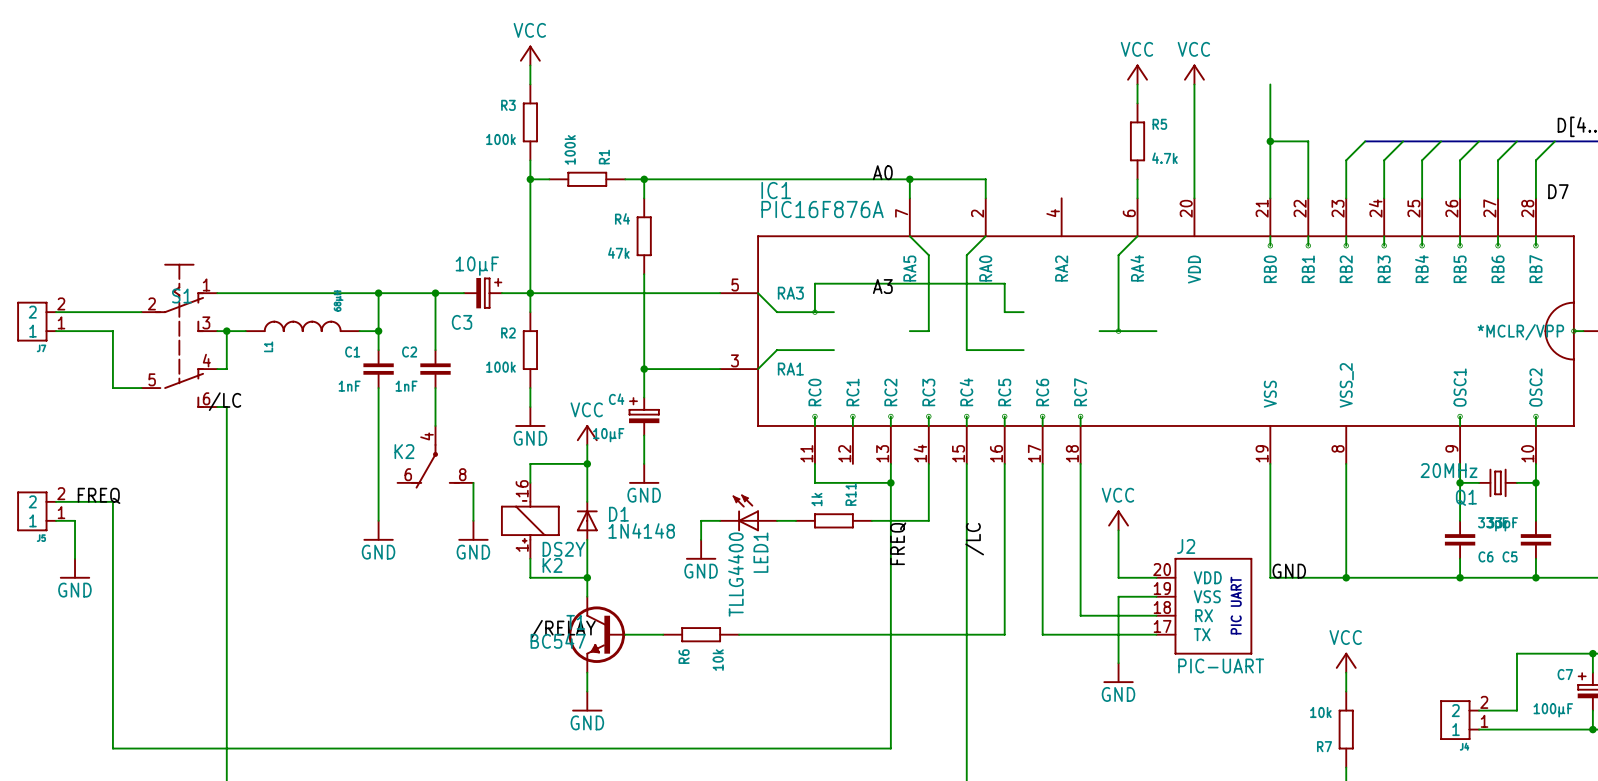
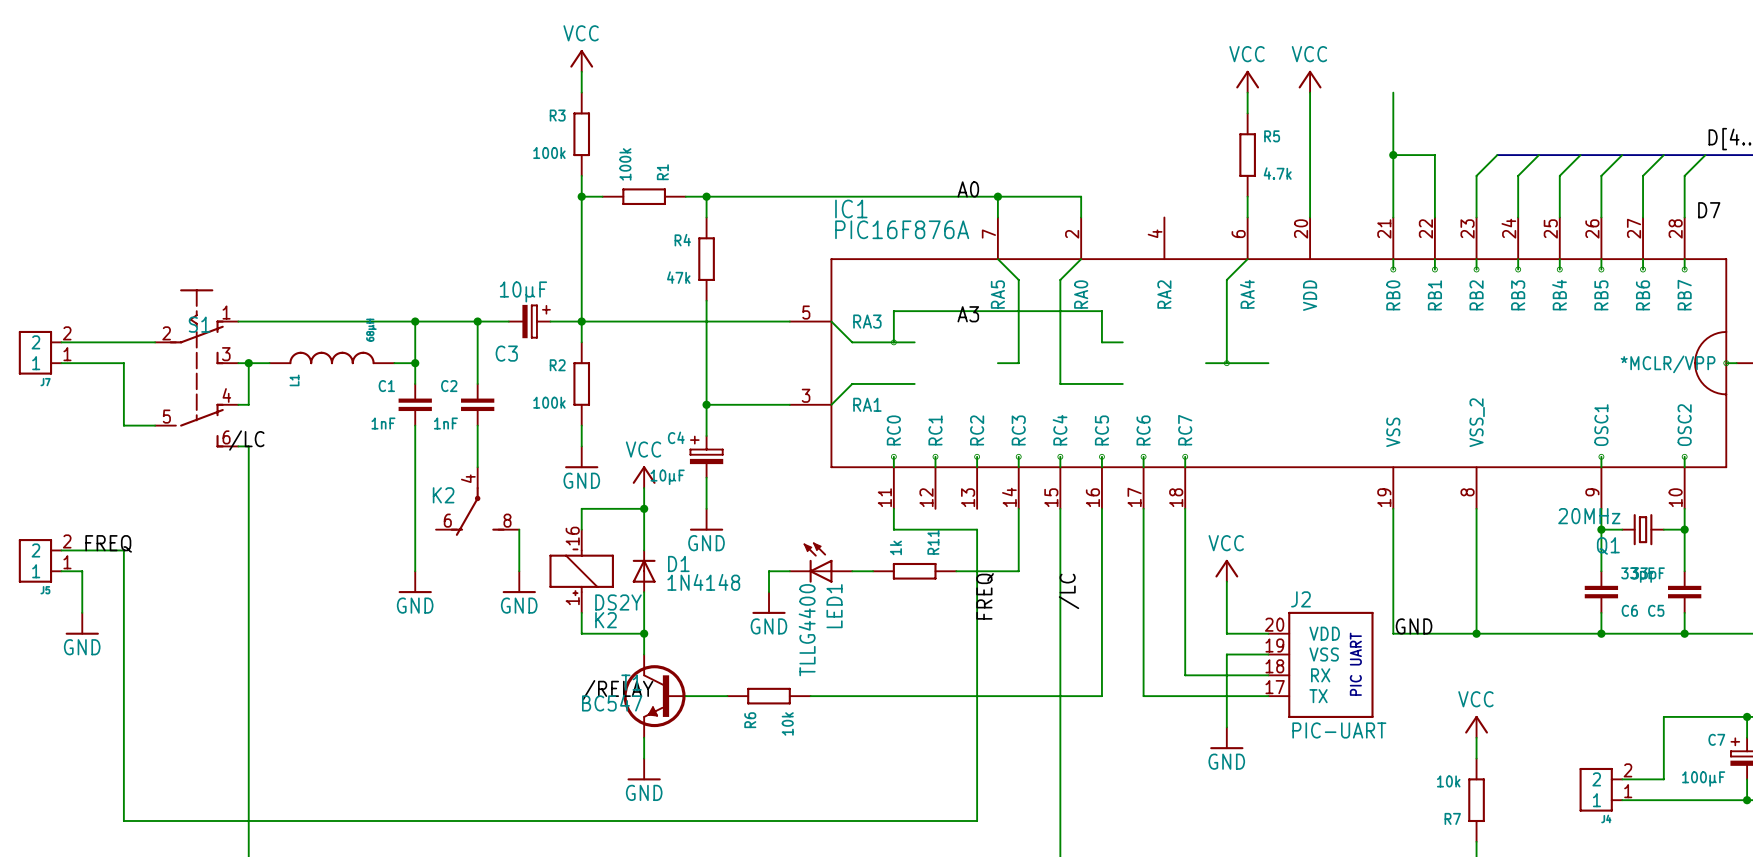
wire: (890, 463) (890, 482) -> none
junction: (890, 482) -> none

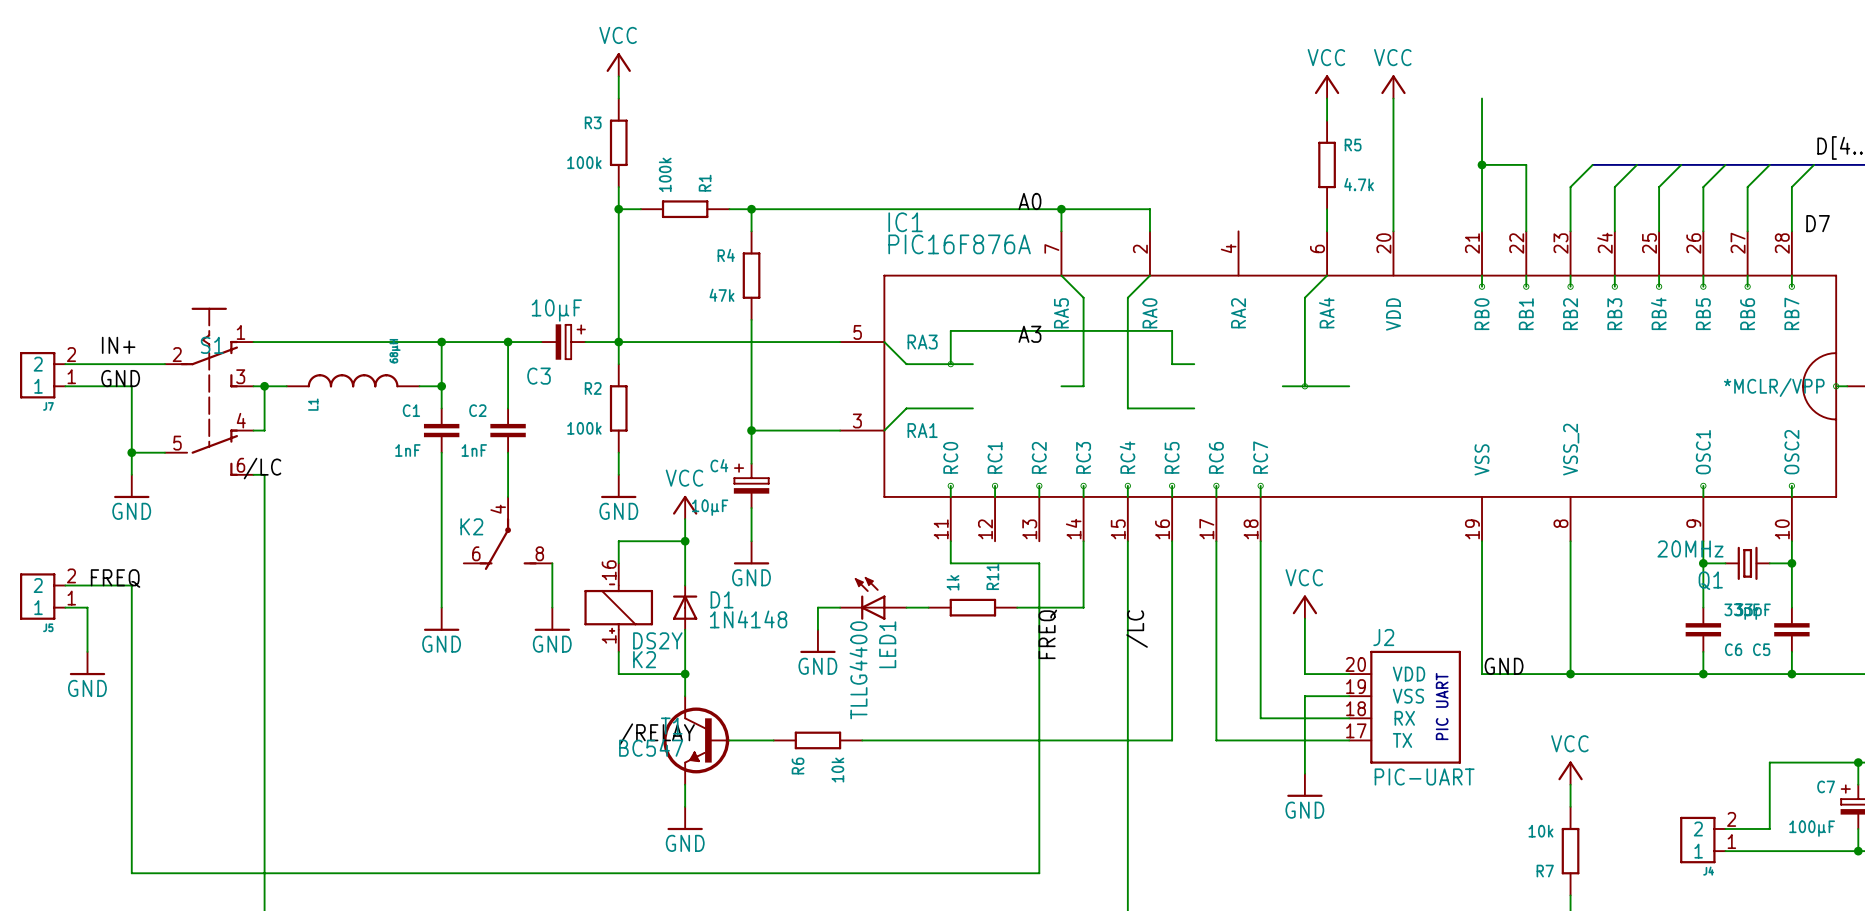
label: none -> IN+ (118, 345)
label: none -> GND (120, 378)
wire: none -> (131, 452) (131, 474)
junction: none -> (131, 452)
power symbol: none -> GND (131, 486)

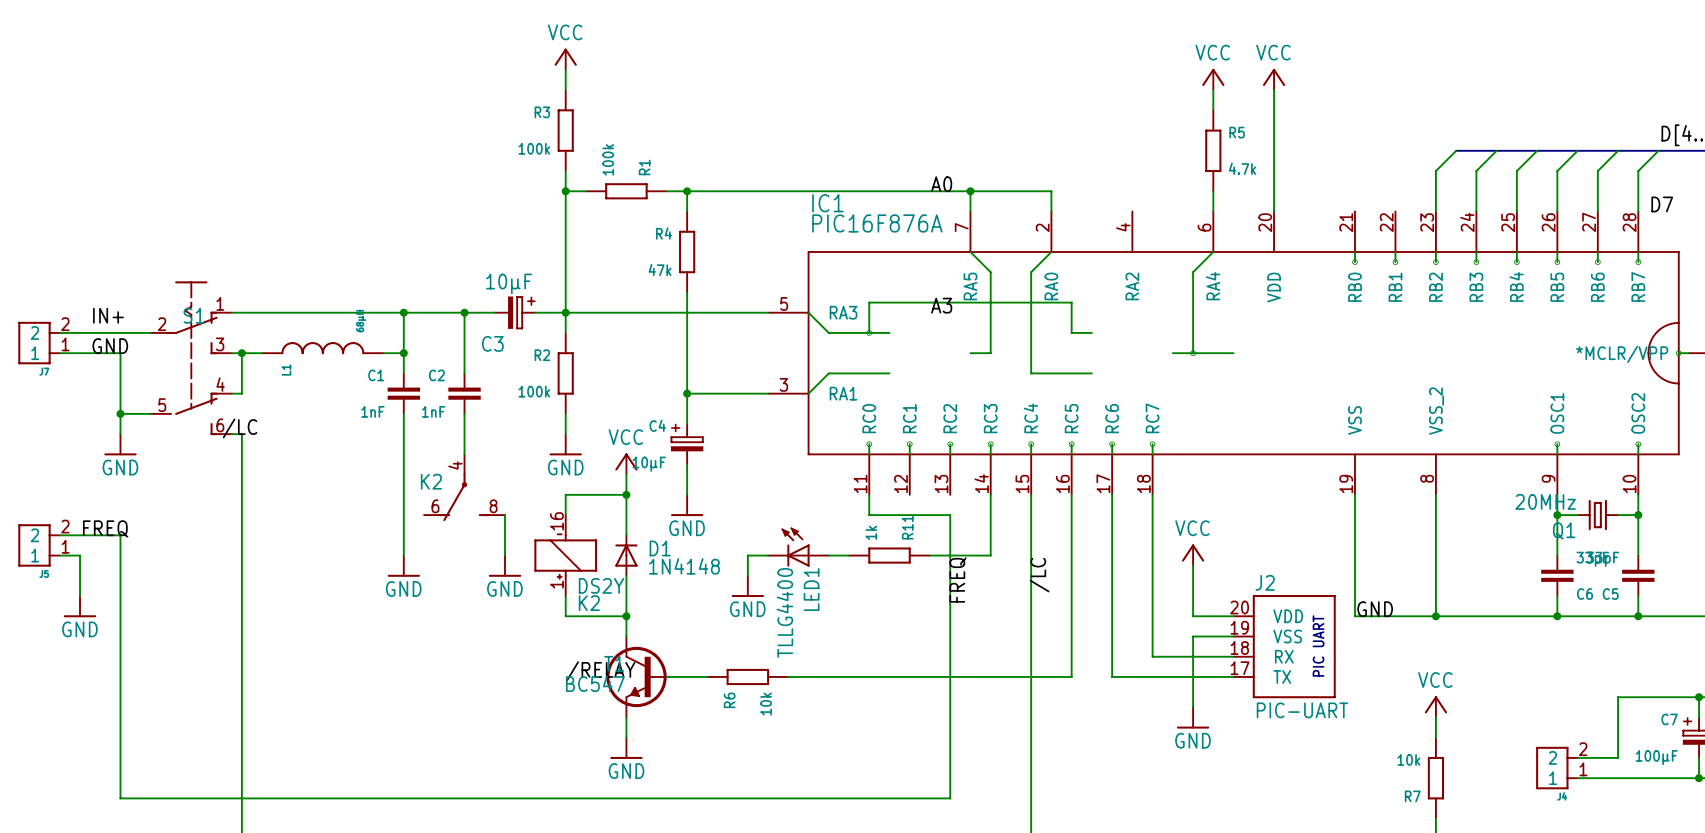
wire: (1482, 98) (1482, 231) -> none
wire: (1482, 164) (1526, 164) (1526, 231) -> none
junction: (1482, 164) -> none

